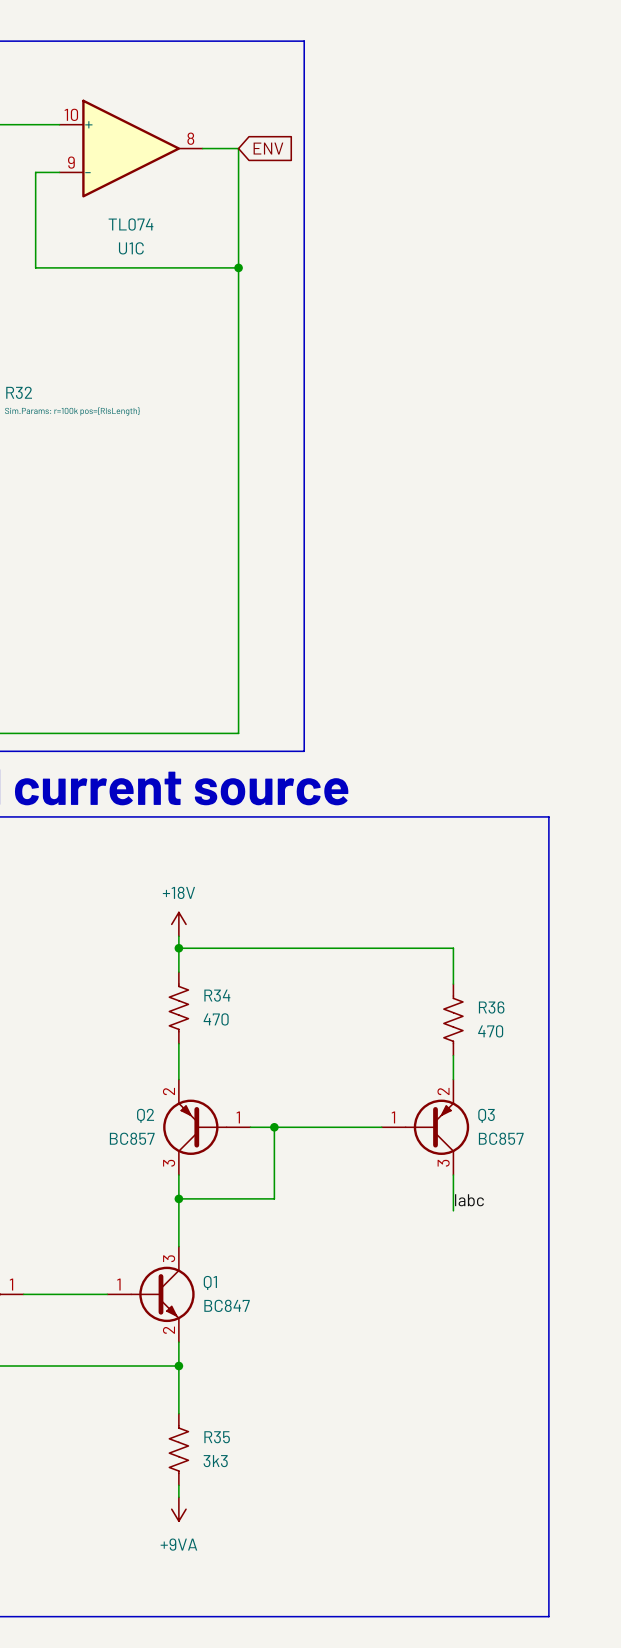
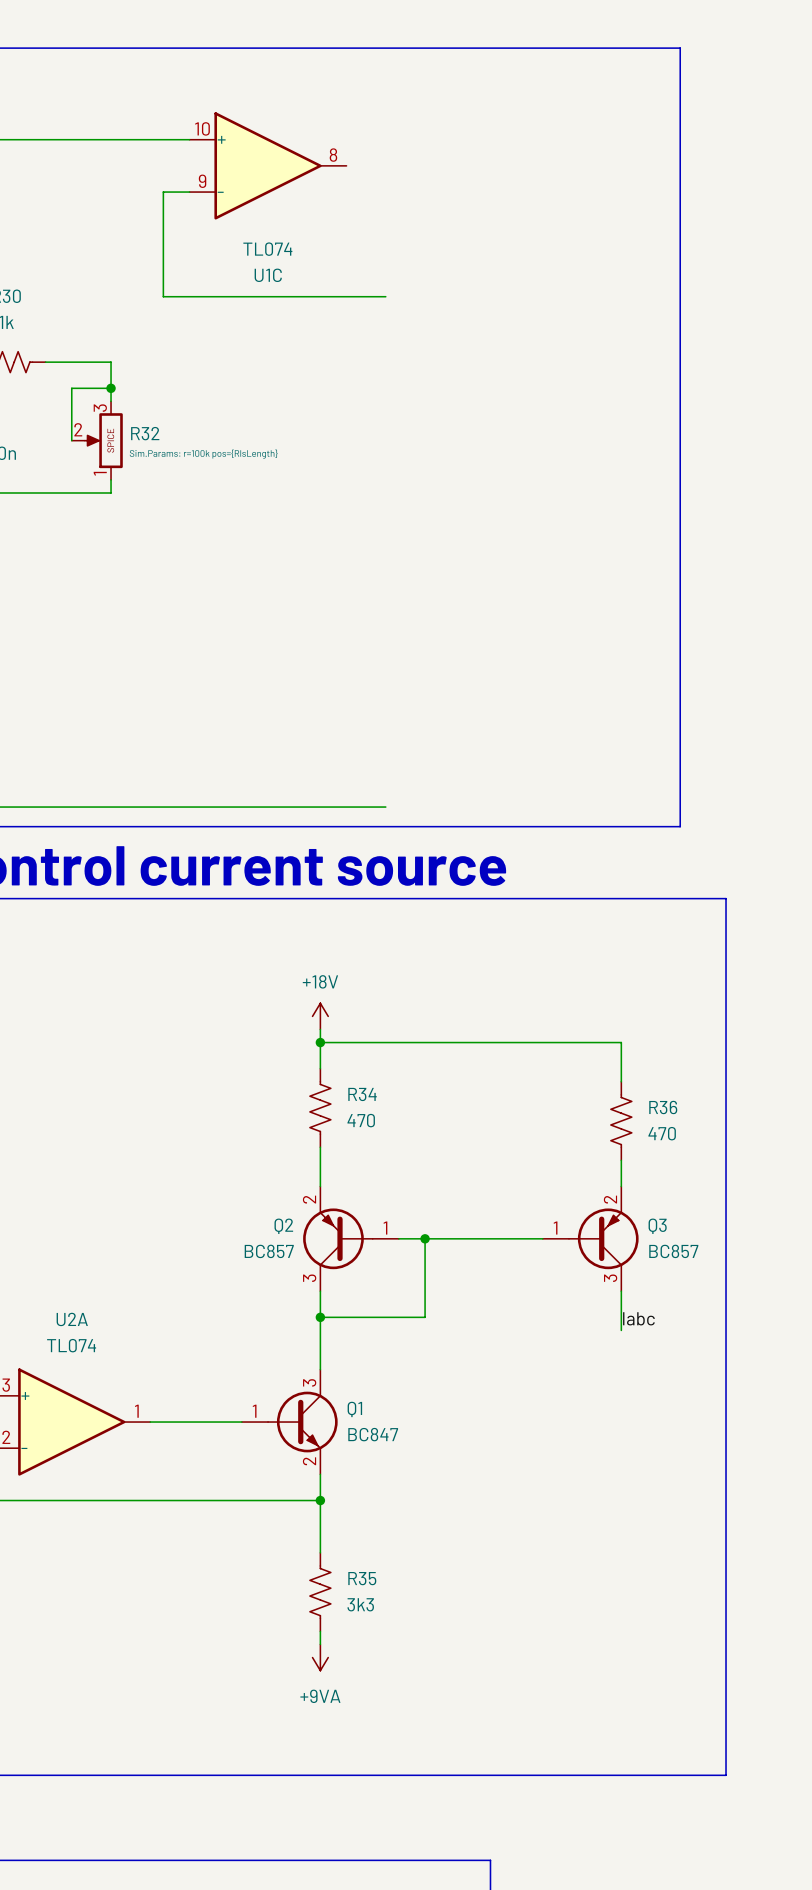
line: (304, 41) (304, 751) -> (457, 48) (680, 48) (680, 826) (457, 826)
wire: (202, 148) (238, 148) (238, 733) -> none
global label: ENV (268, 148) -> none
junction: (238, 267) -> none

